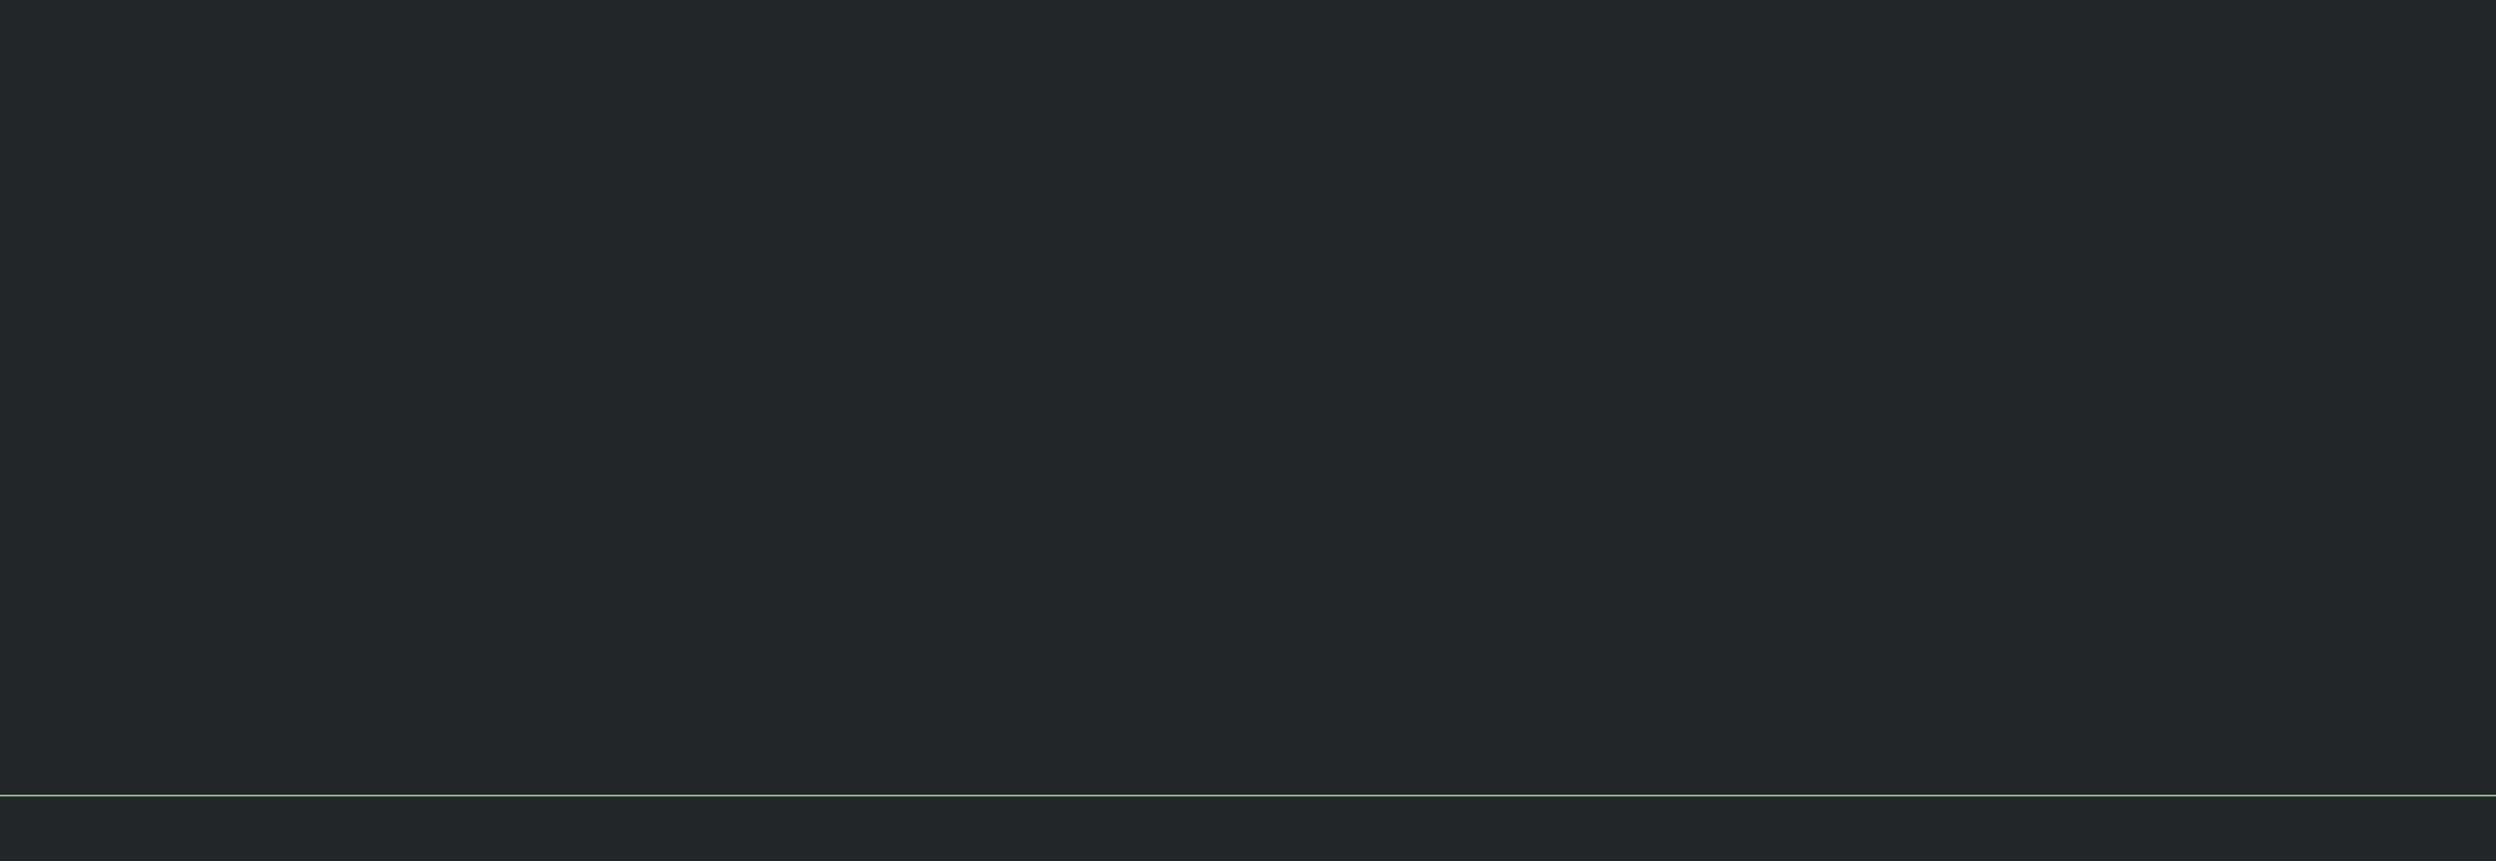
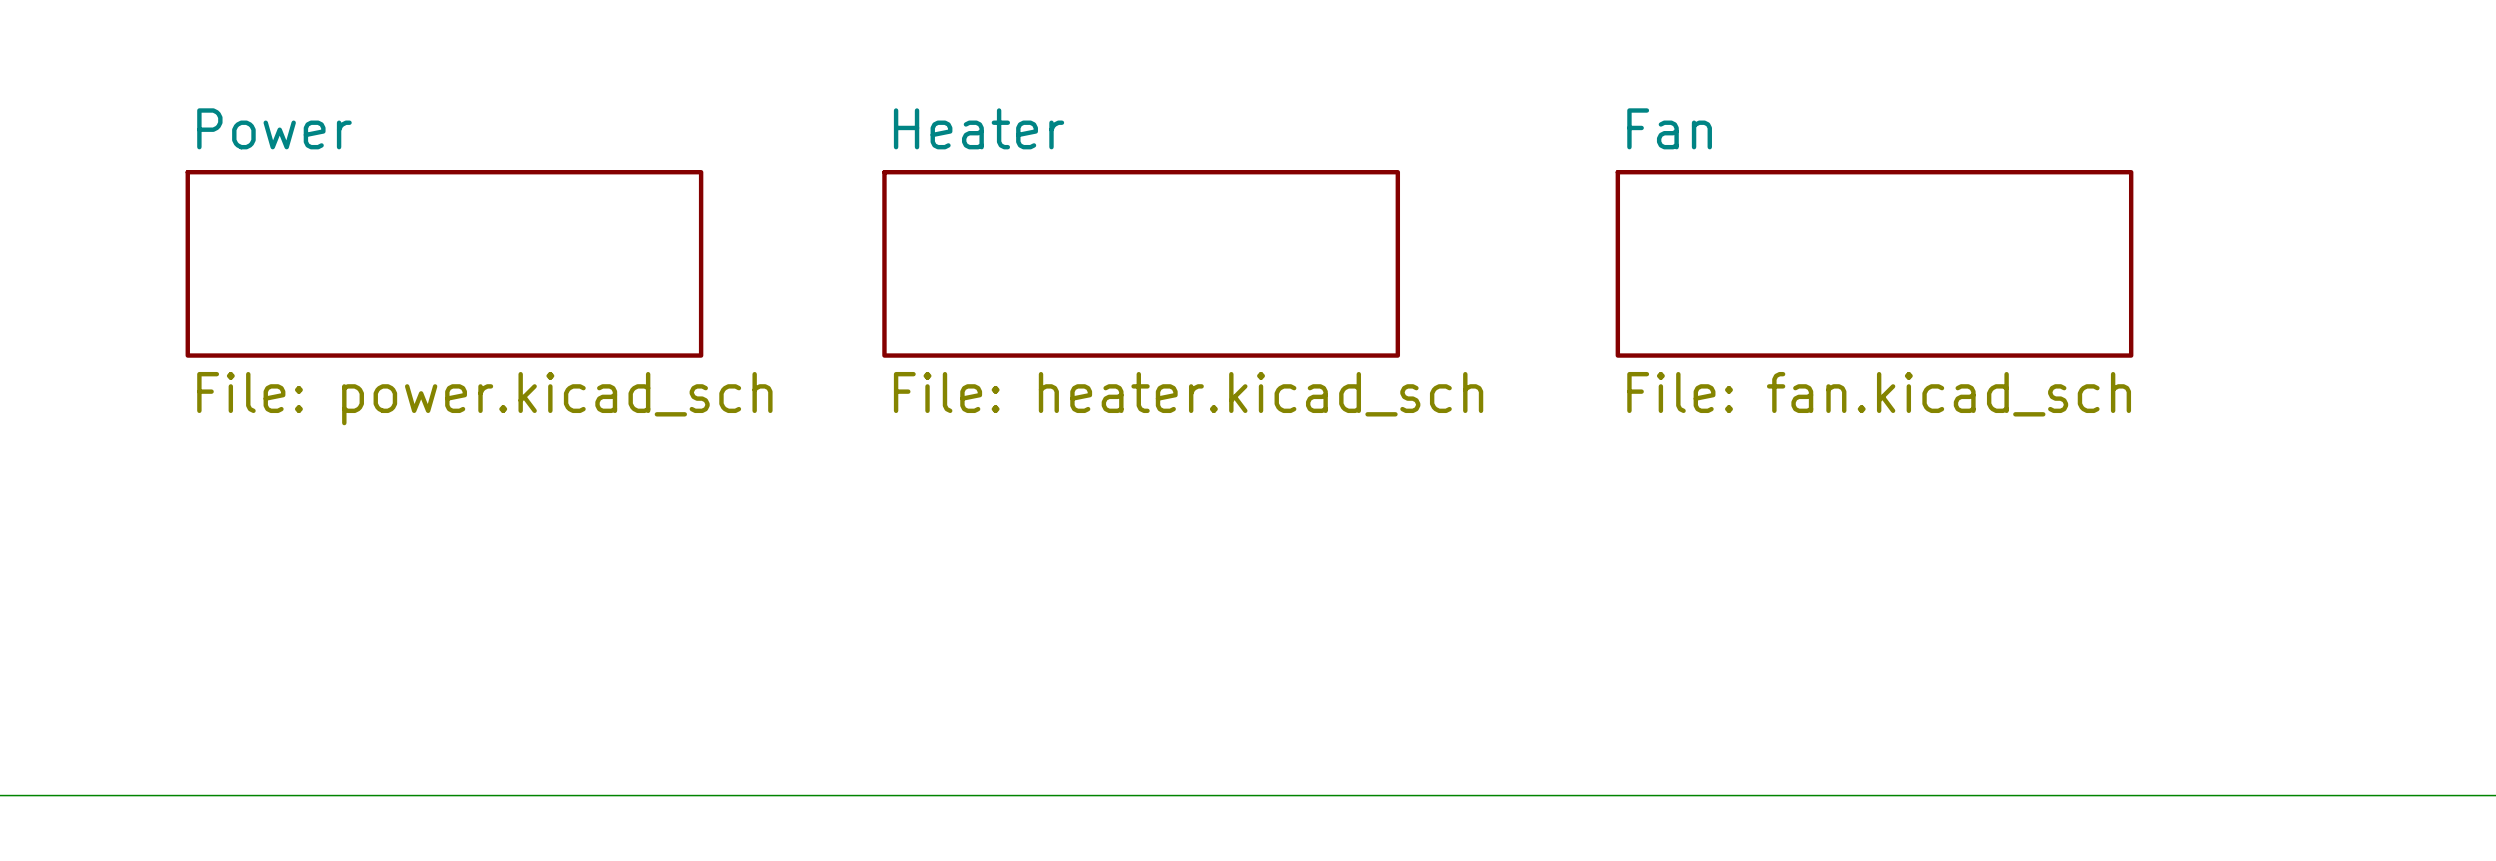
sheet Power: none -> File: power.kicad_sch (444, 263)
sheet Heater: none -> File: heater.kicad_sch (1141, 263)
sheet Fan: none -> File: fan.kicad_sch (1874, 263)

